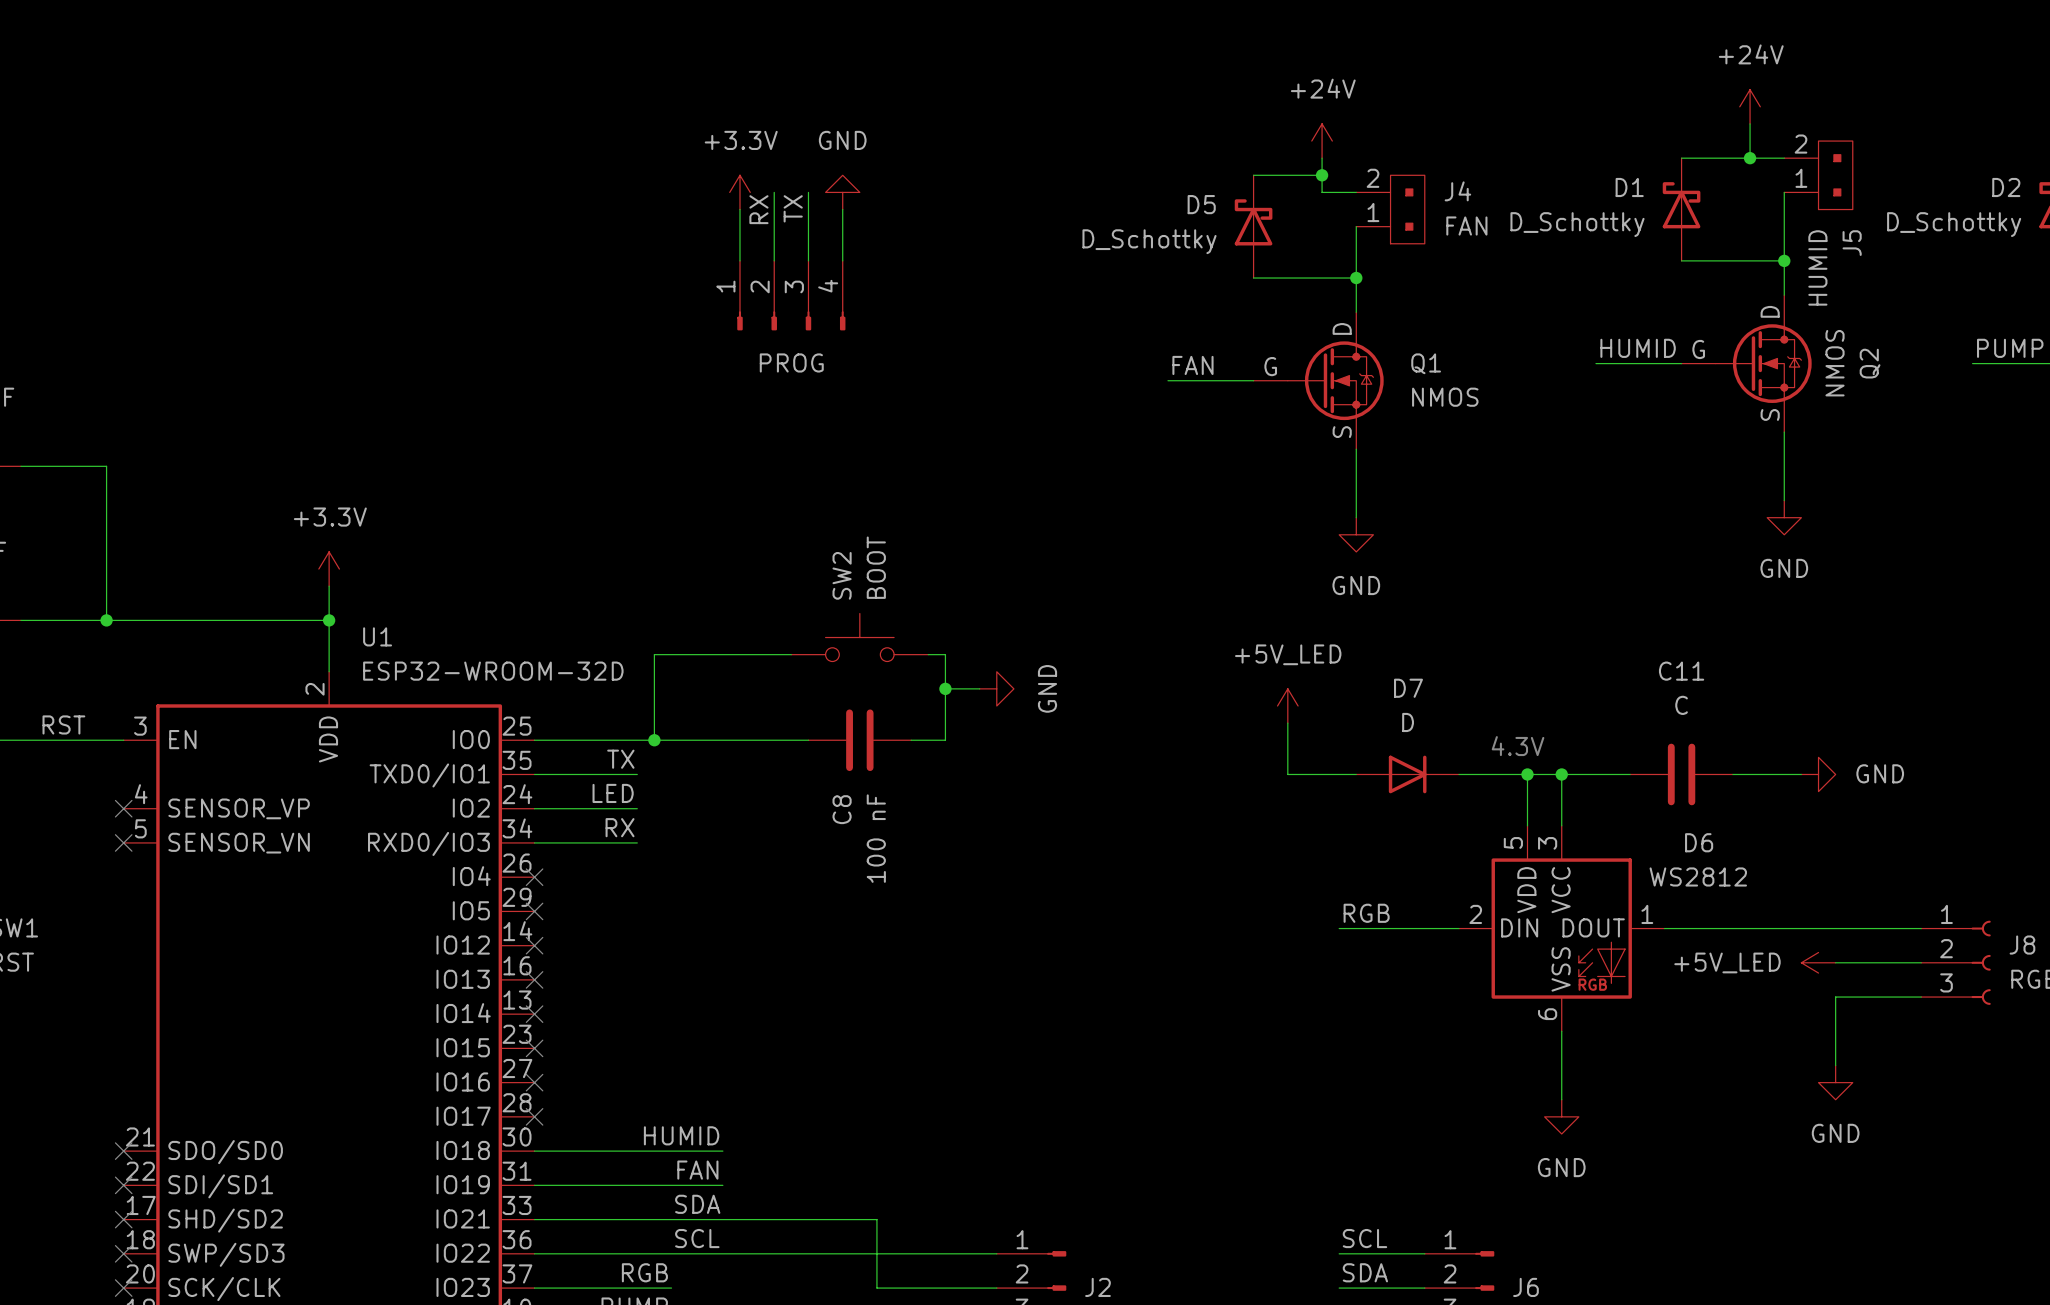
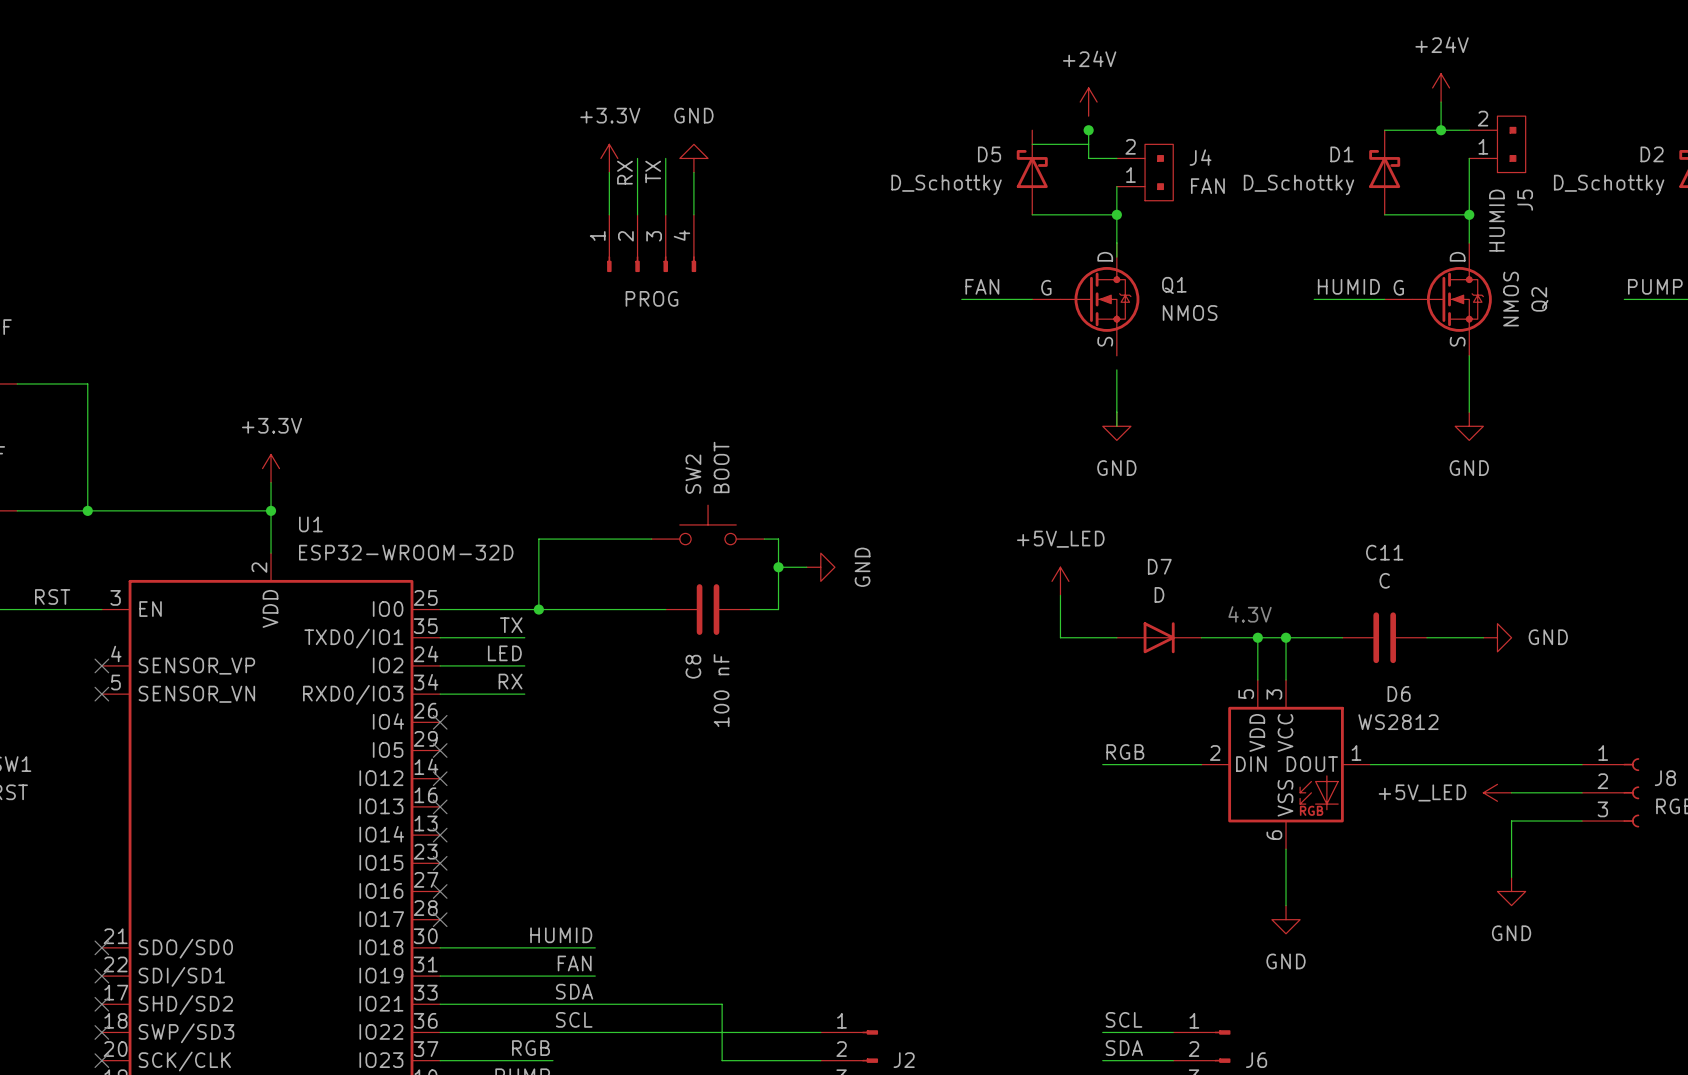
power symbol position: +24V (1322, 141) -> +24V (1088, 102)
junction position: (1322, 175) -> (1088, 130)
D5 position: (1253, 226) -> (1032, 172)
wire: (1253, 278) (1356, 278) -> (1032, 214) (1116, 214)
junction position: (1356, 278) -> (1116, 214)
label position: FAN (1192, 365) -> FAN (982, 286)
wire: (1167, 380) (1253, 380) -> (961, 299) (1032, 299)
Q1 position: (1318, 380) -> (1085, 299)
power symbol position: GND (1356, 534) -> GND (1116, 426)

